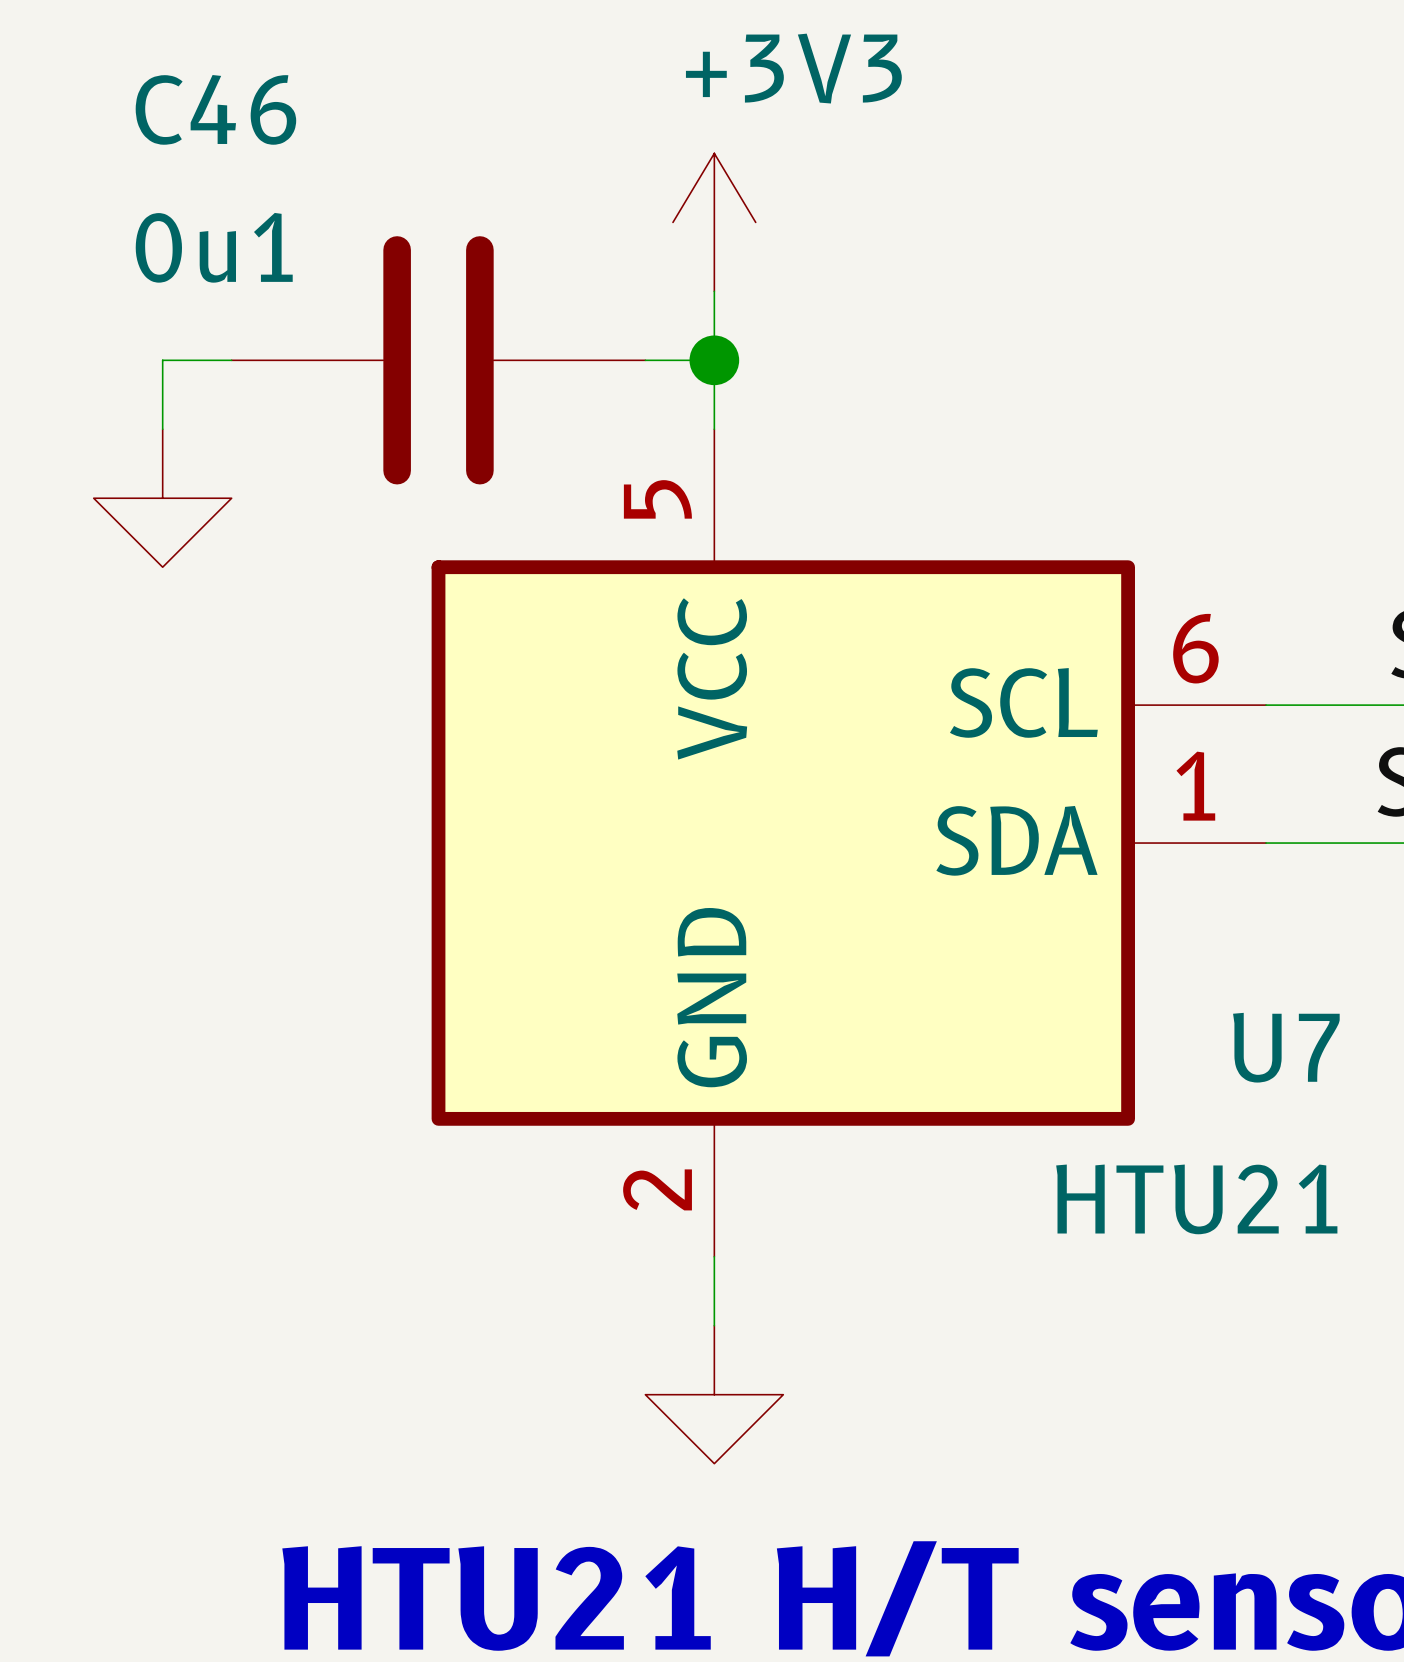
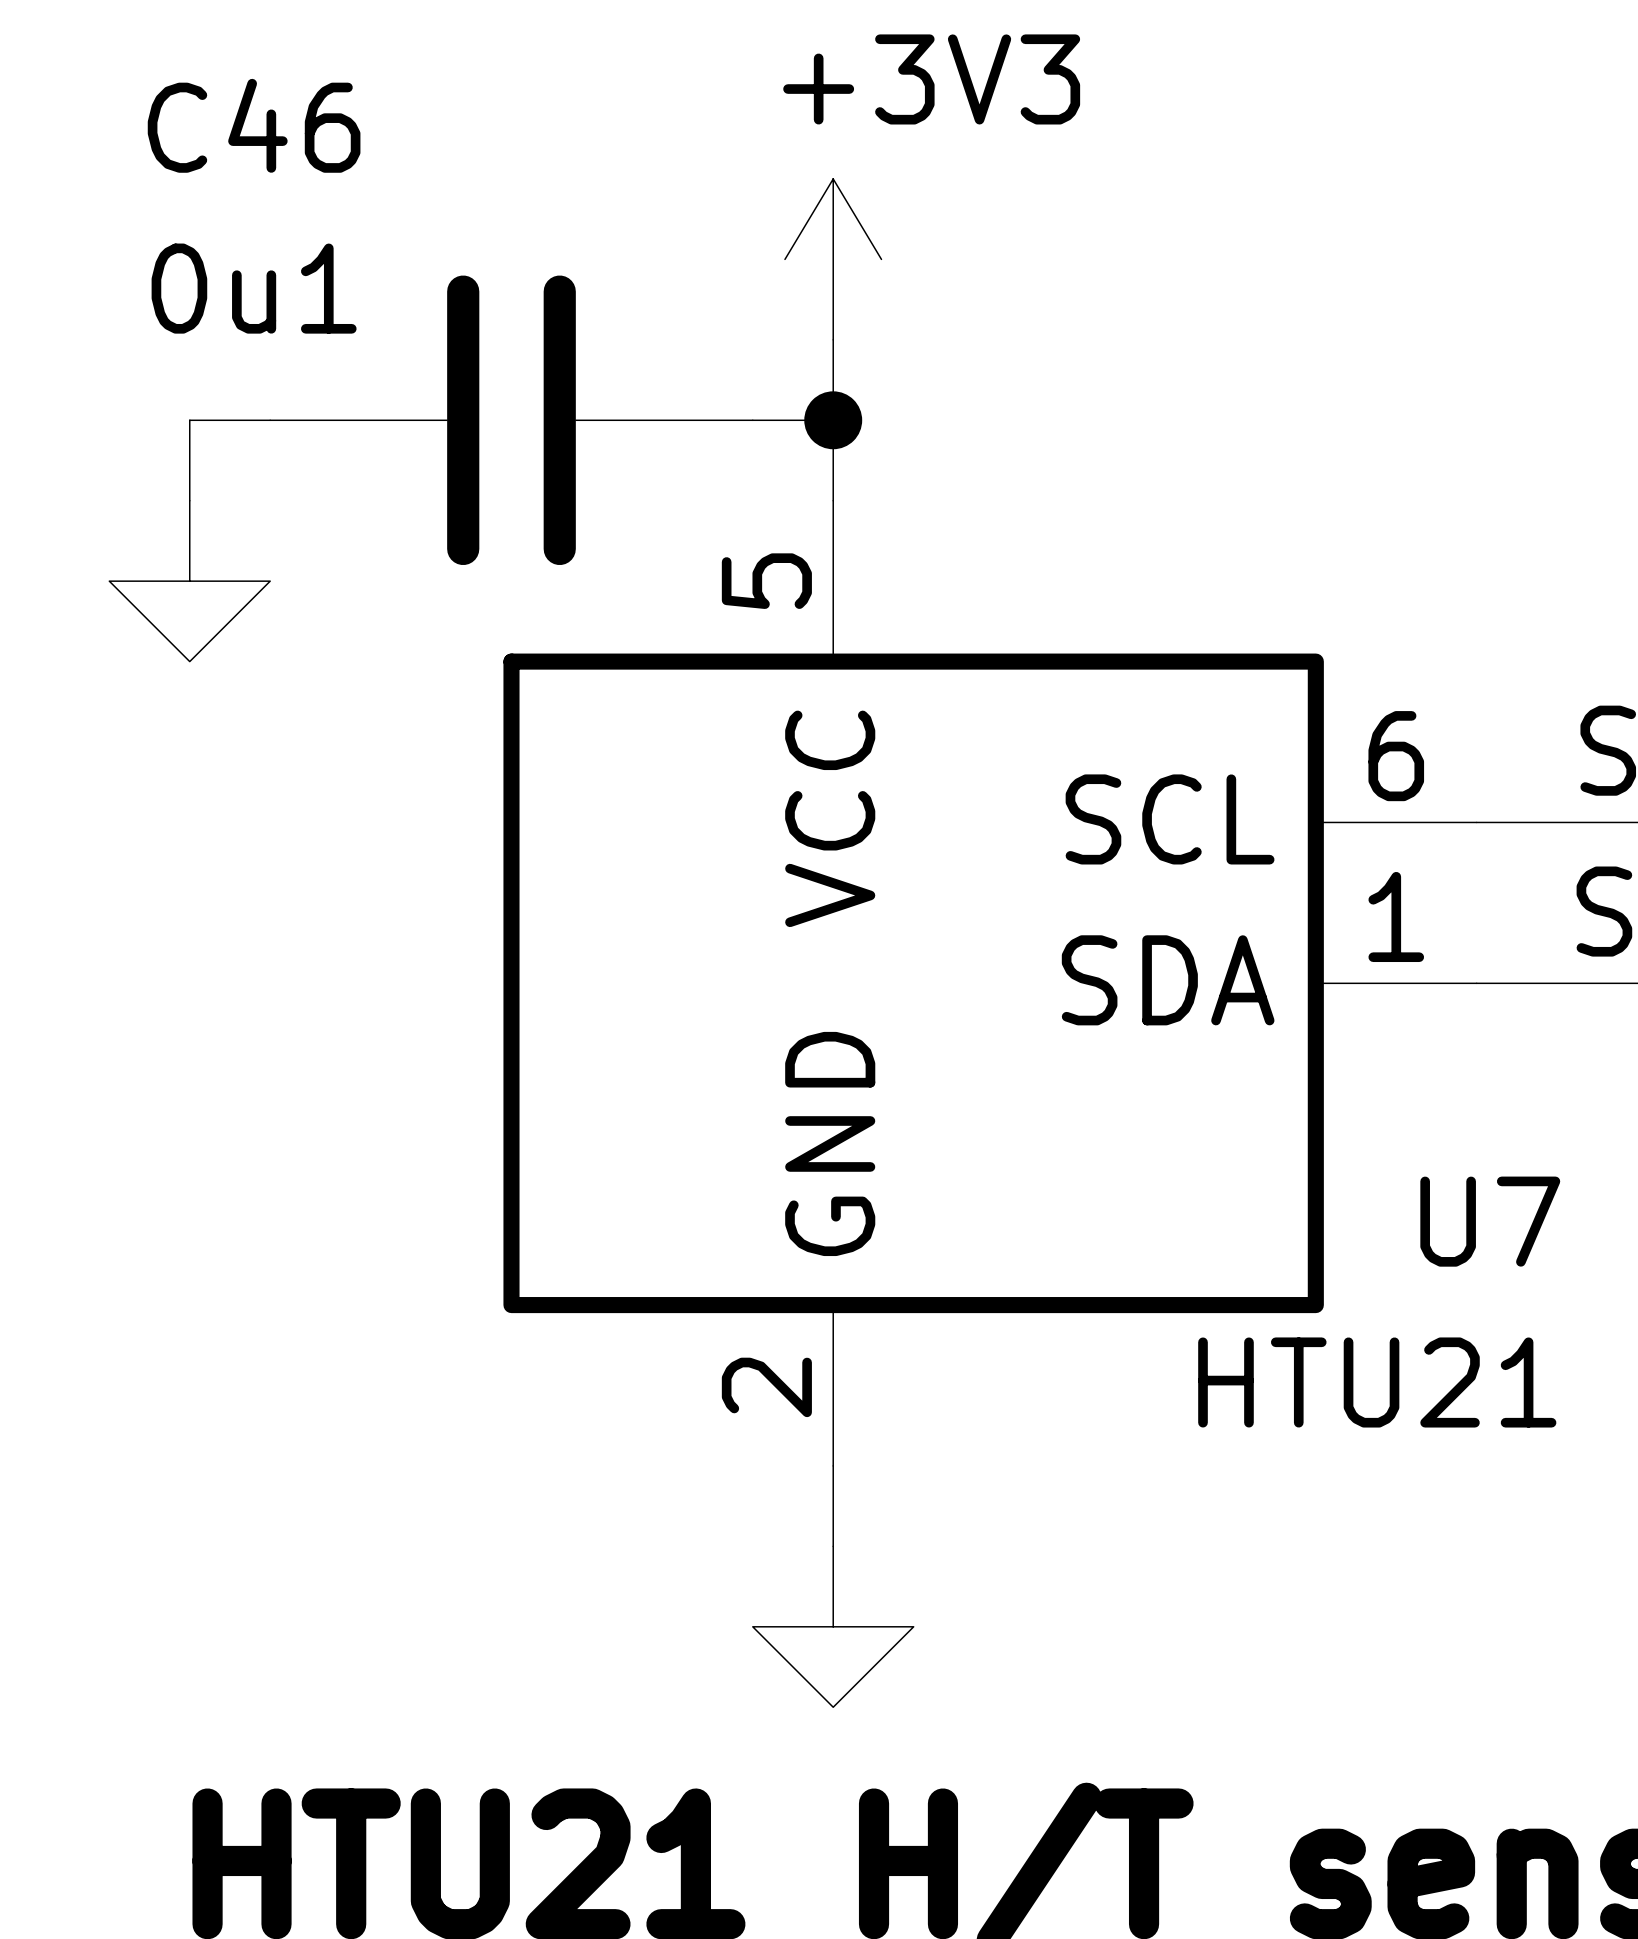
U7 value position: HTU21 (1196, 1199) -> HTU21 (1377, 1382)

